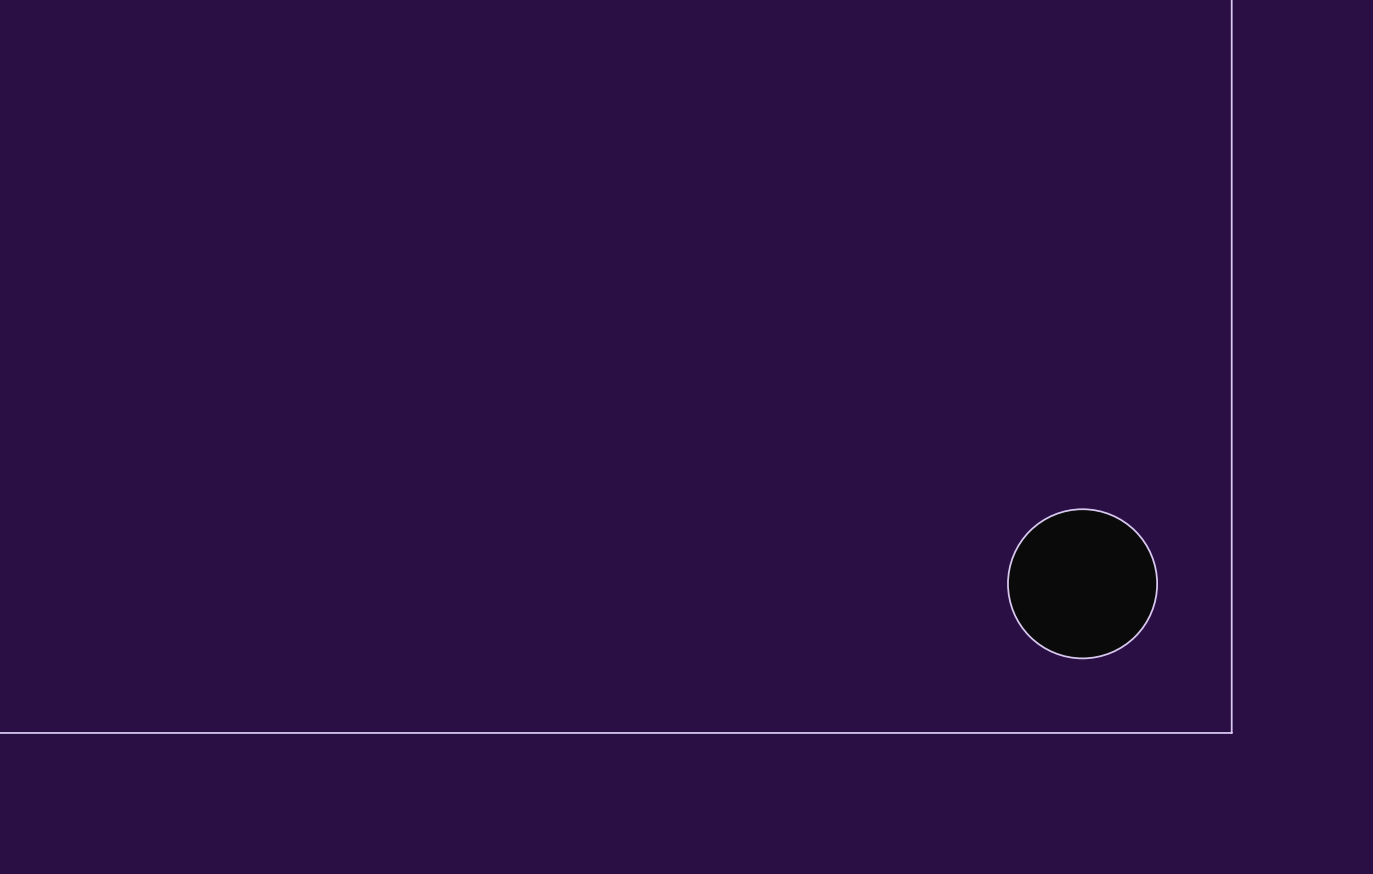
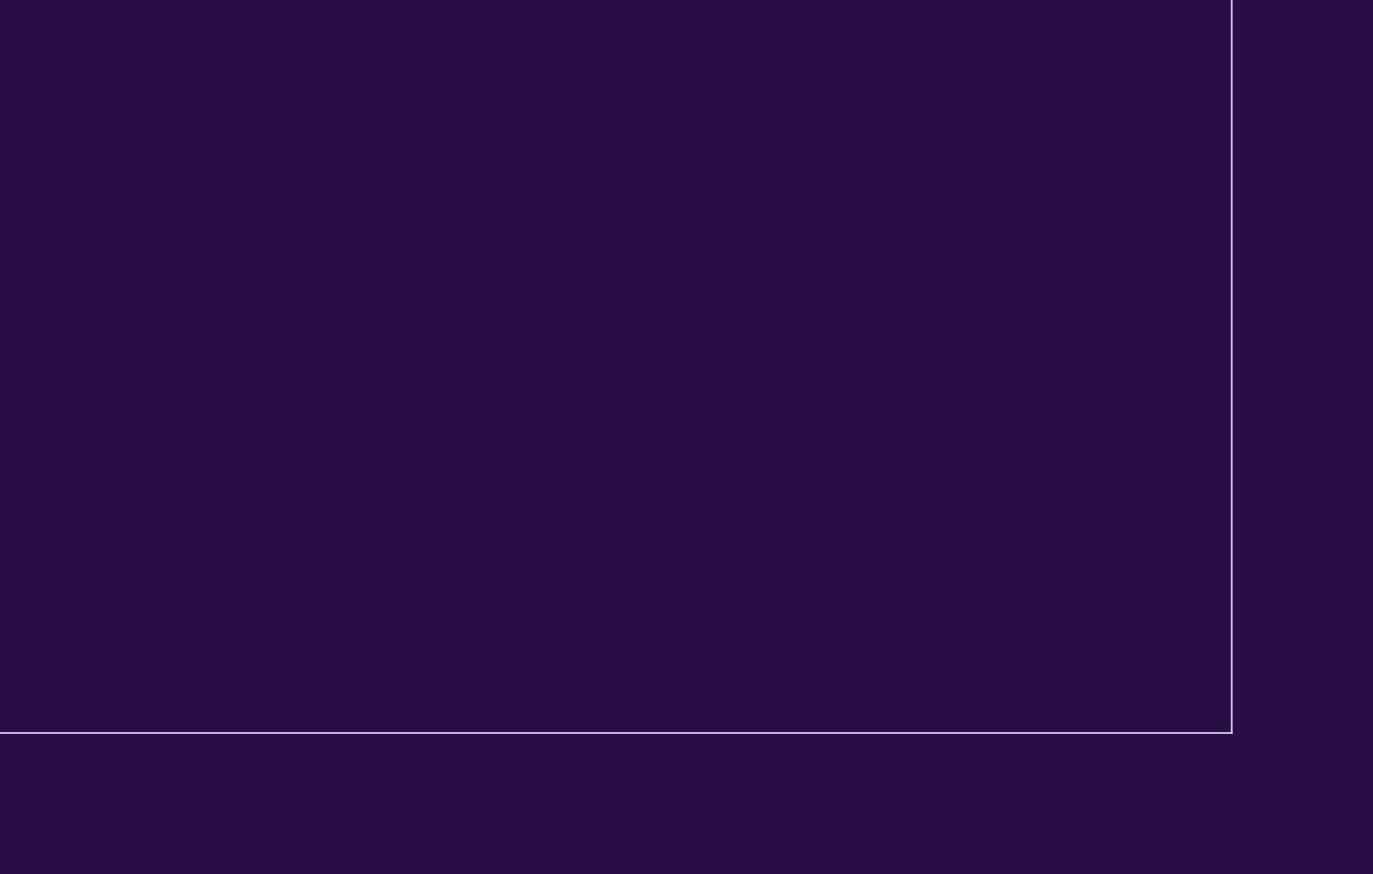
hole: (1082, 583) -> none

